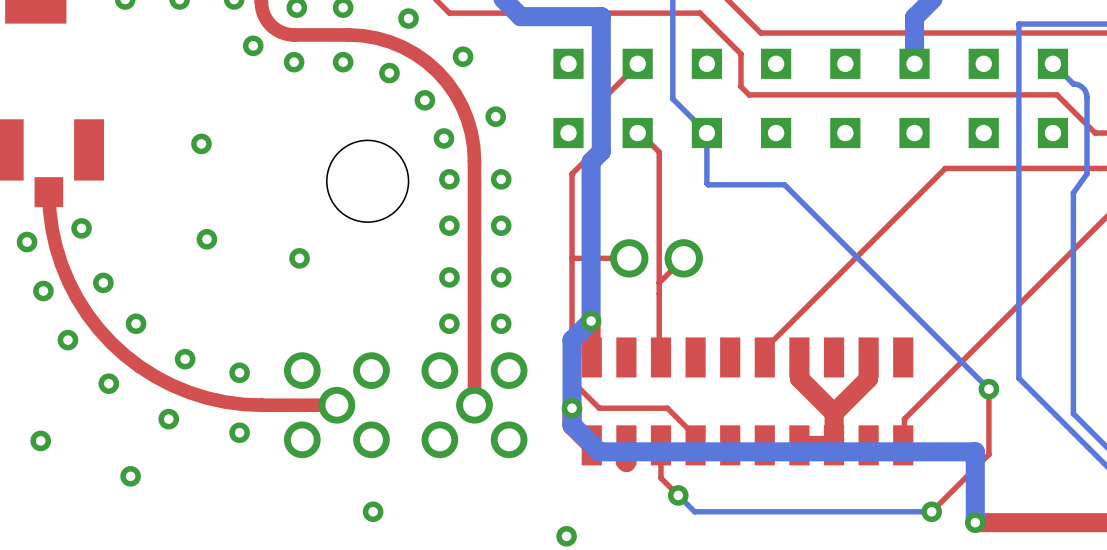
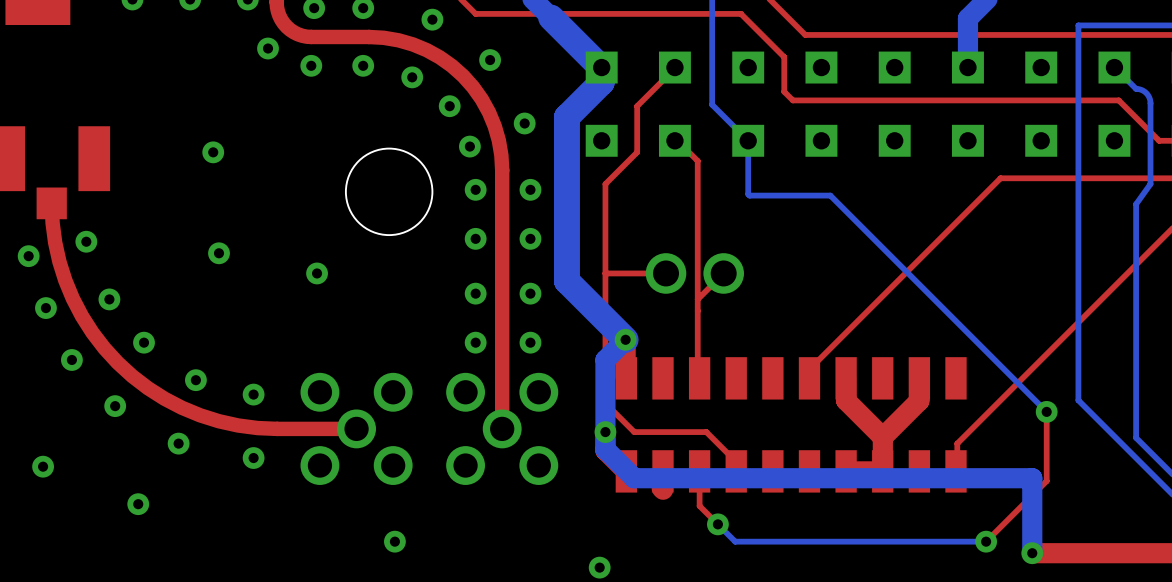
bottom track: (520, 16) (601, 16) (601, 151) (591, 161) (591, 321) -> (551, 17) (601, 67) (601, 82) (566, 117) (566, 281) (625, 339)

